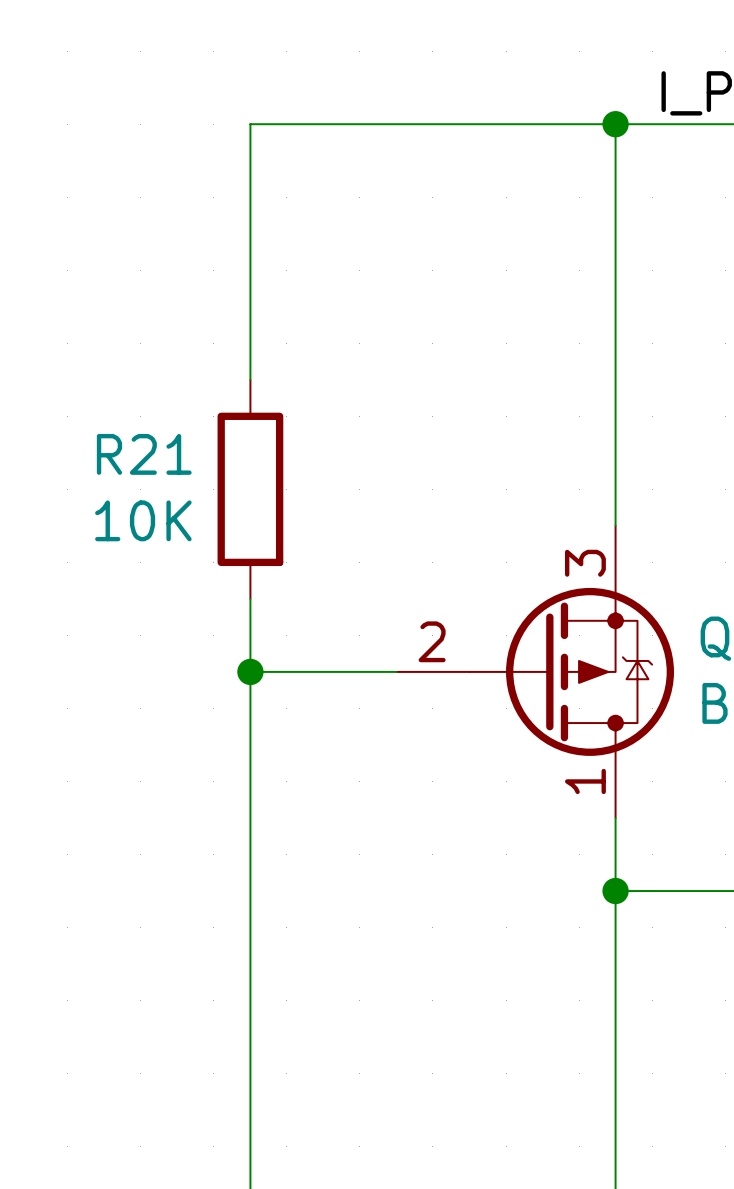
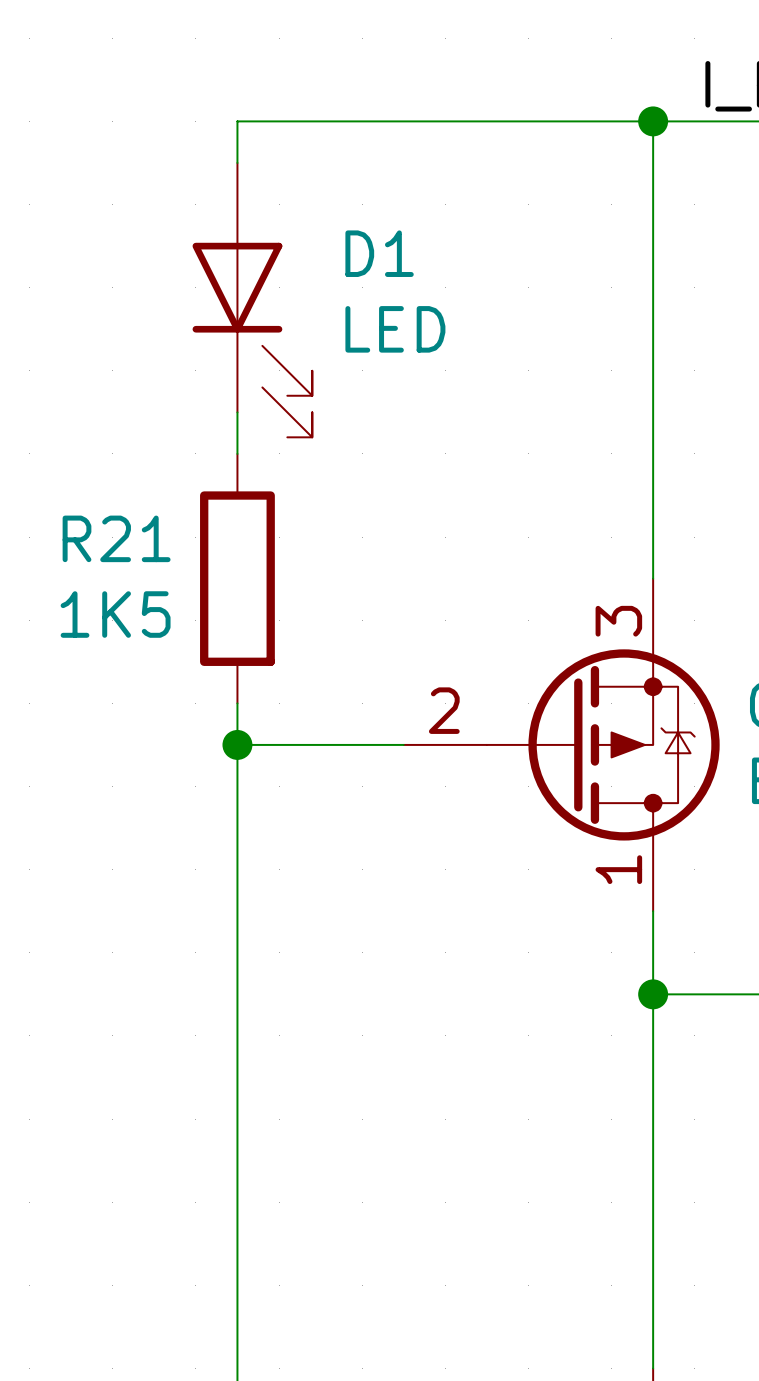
D1: none -> LED (252, 300)
R21 position: (250, 489) -> (237, 578)
R21 value: 10K (143, 520) -> 1K5 (115, 614)

